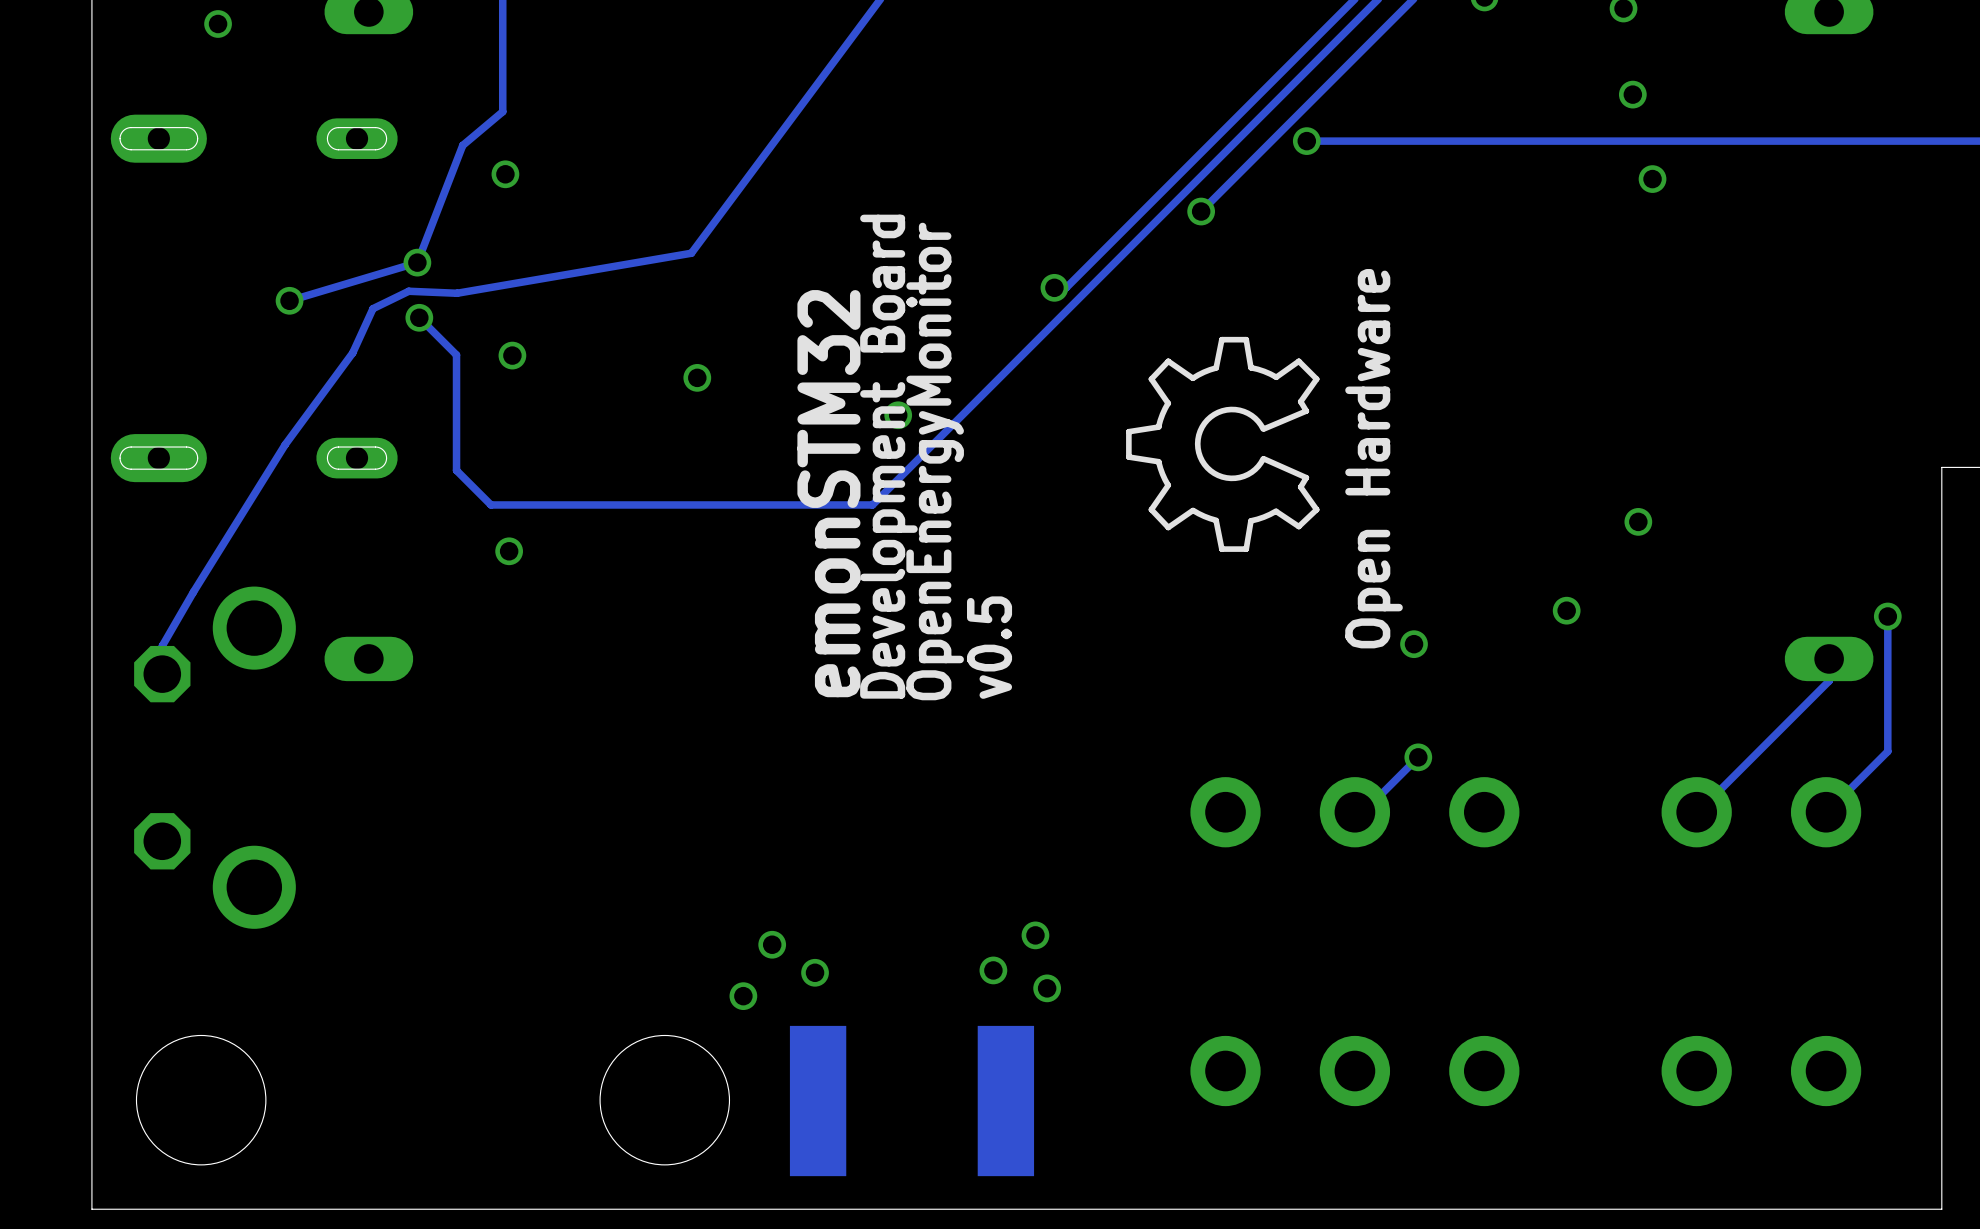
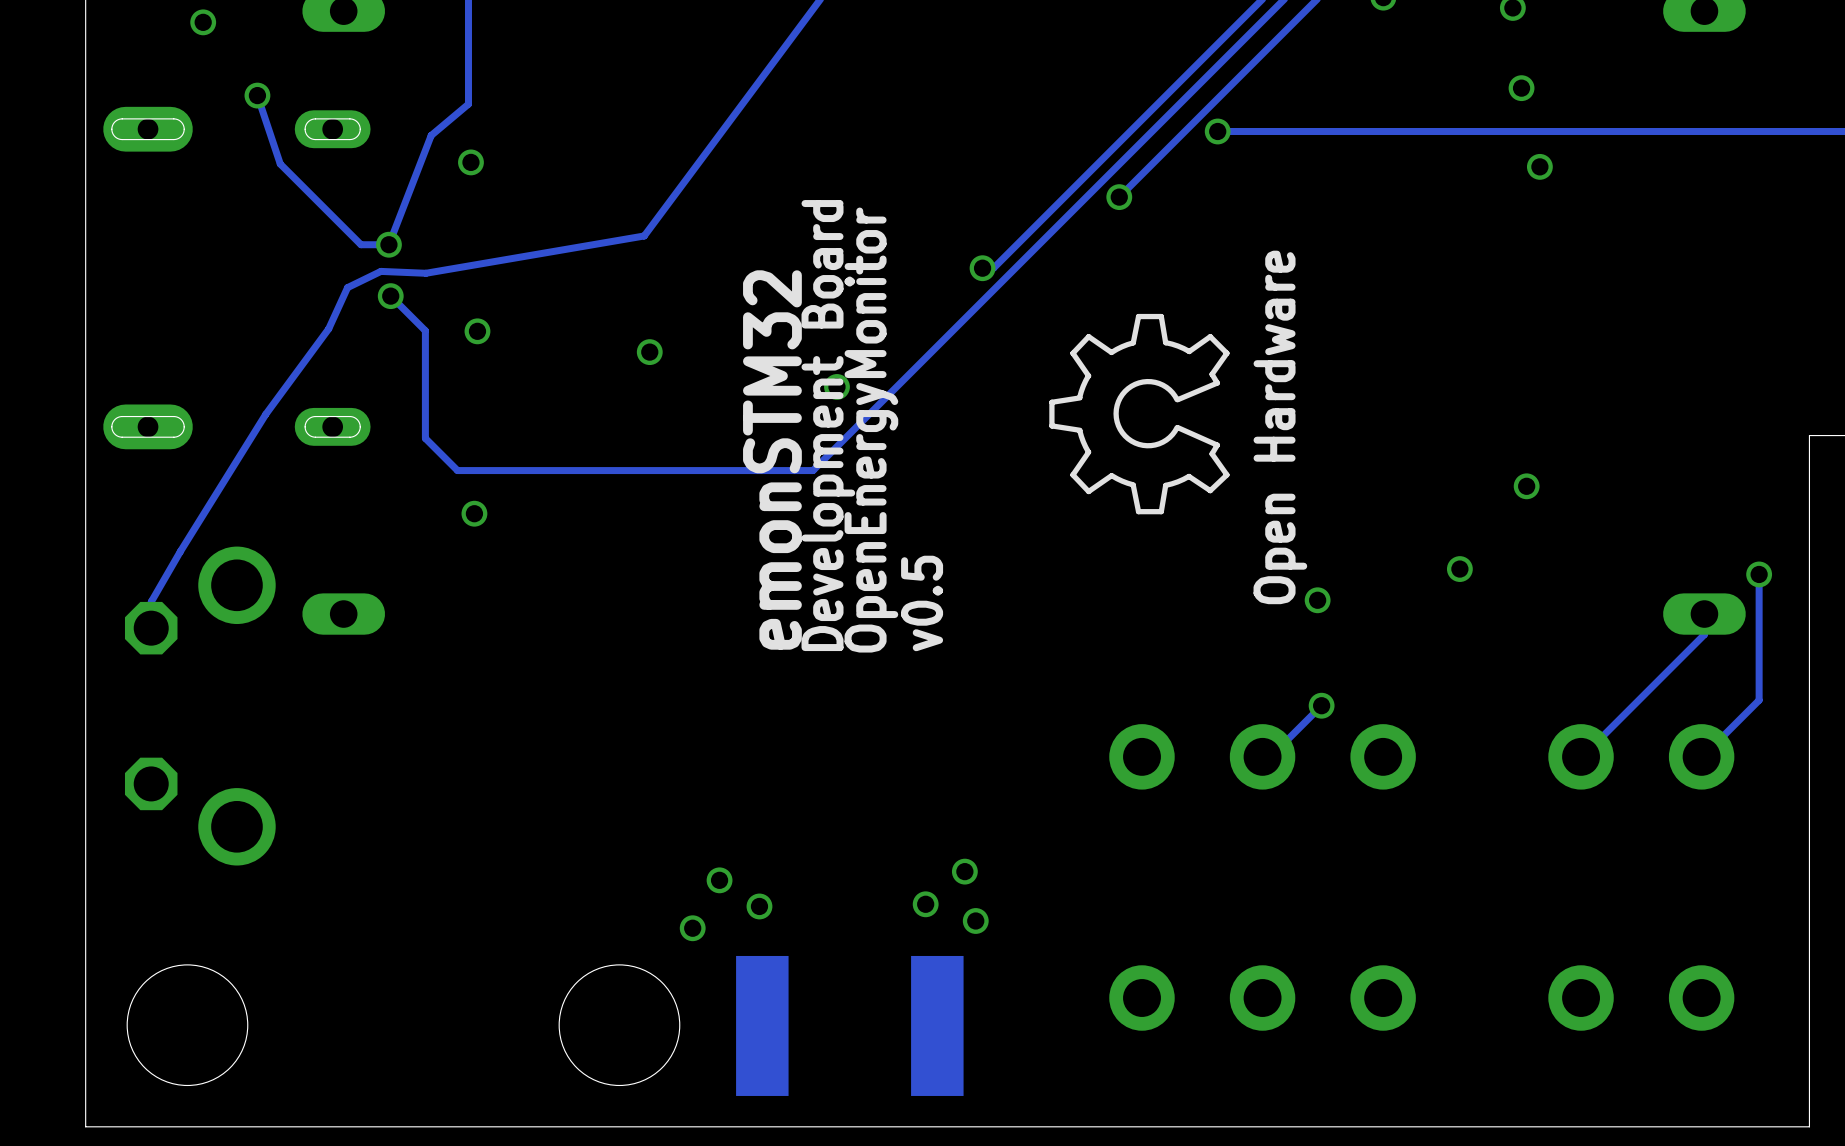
track: (417, 262) (289, 300) -> (388, 244) (361, 244) (280, 163) (257, 95)
via position: (289, 300) -> (257, 95)

